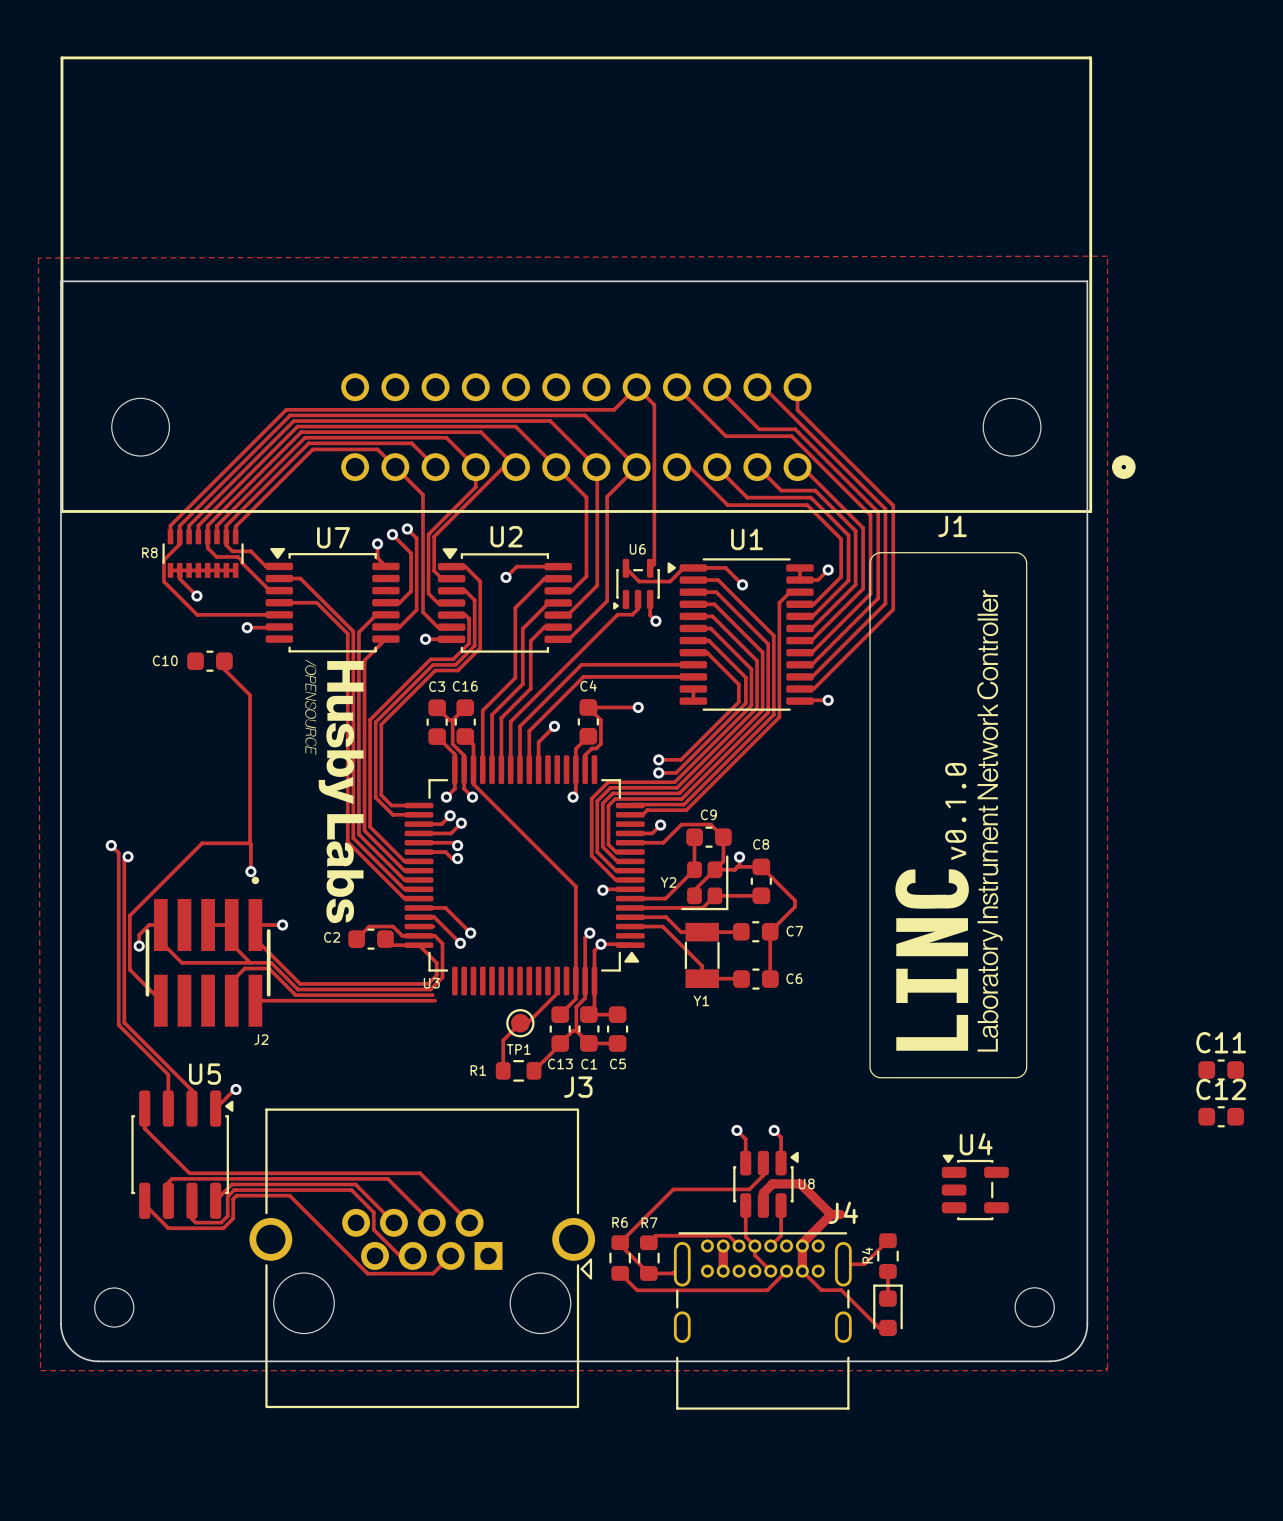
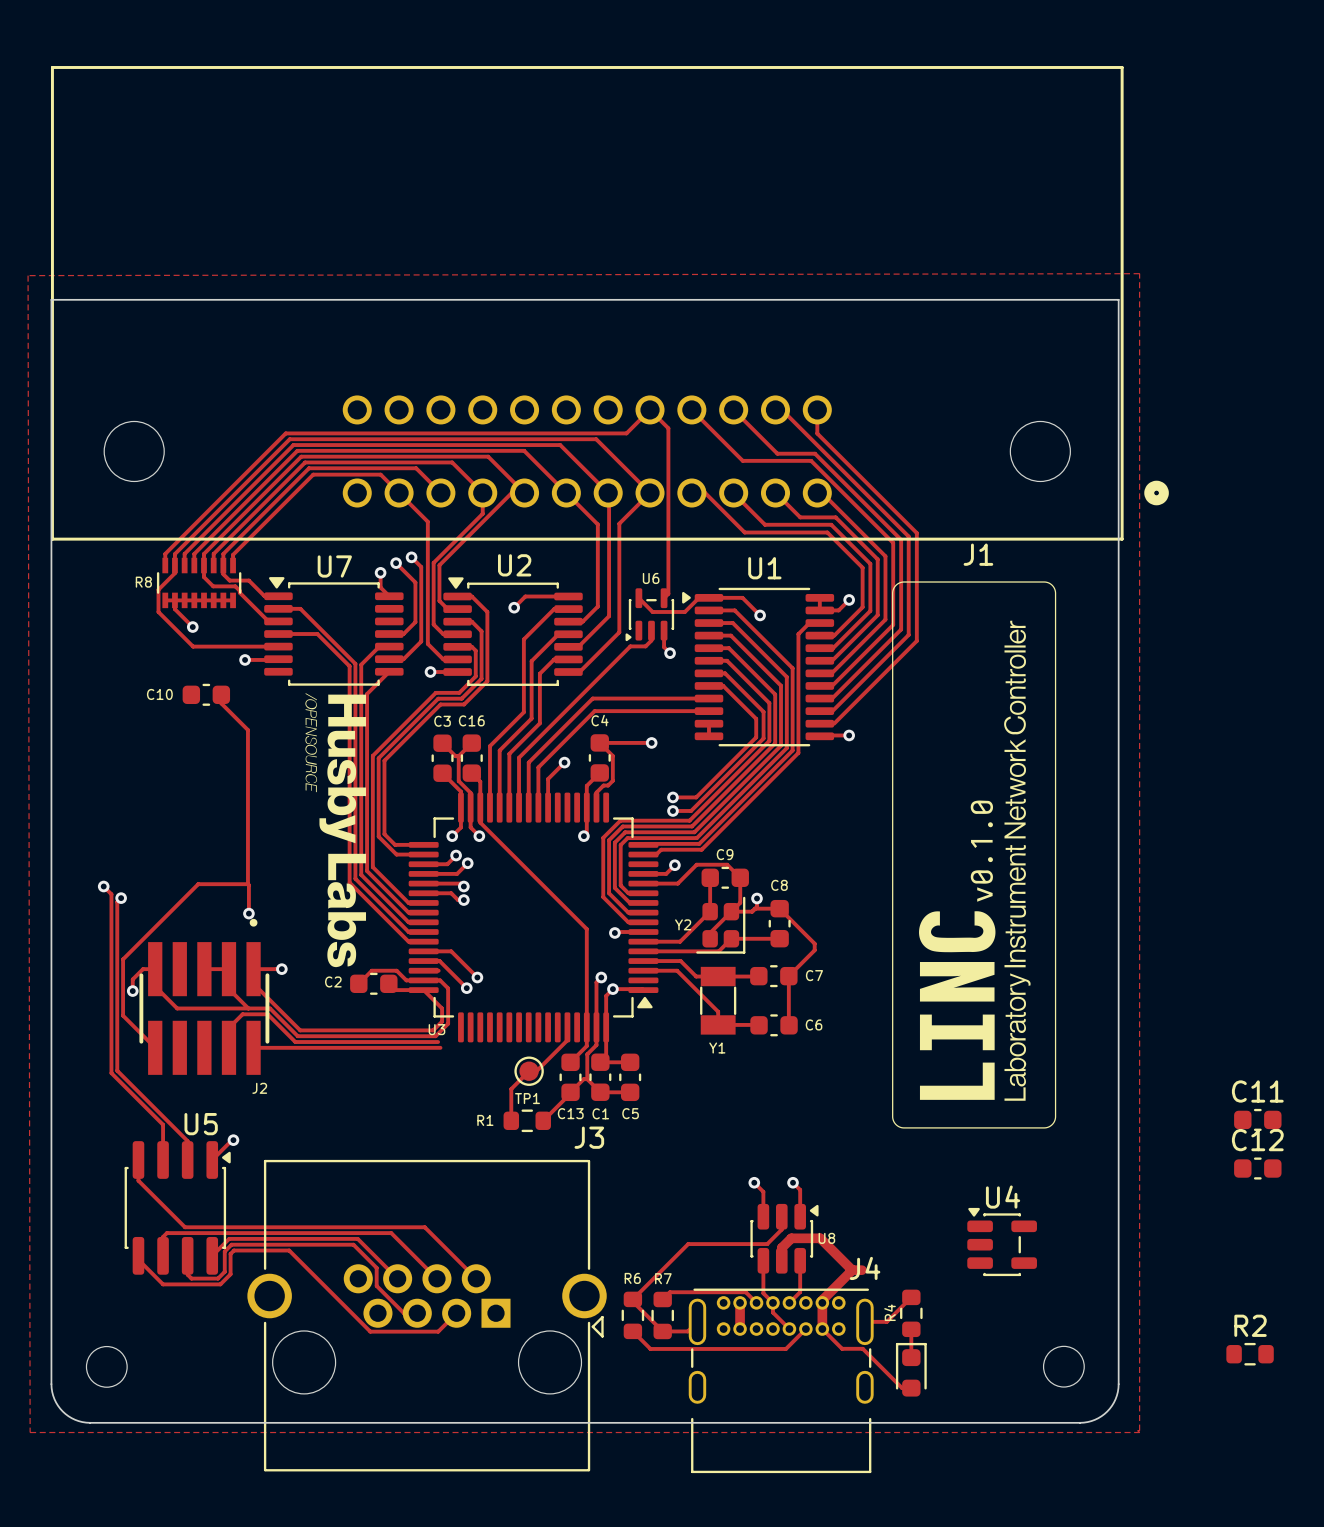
R2: none -> (1250, 1354)

